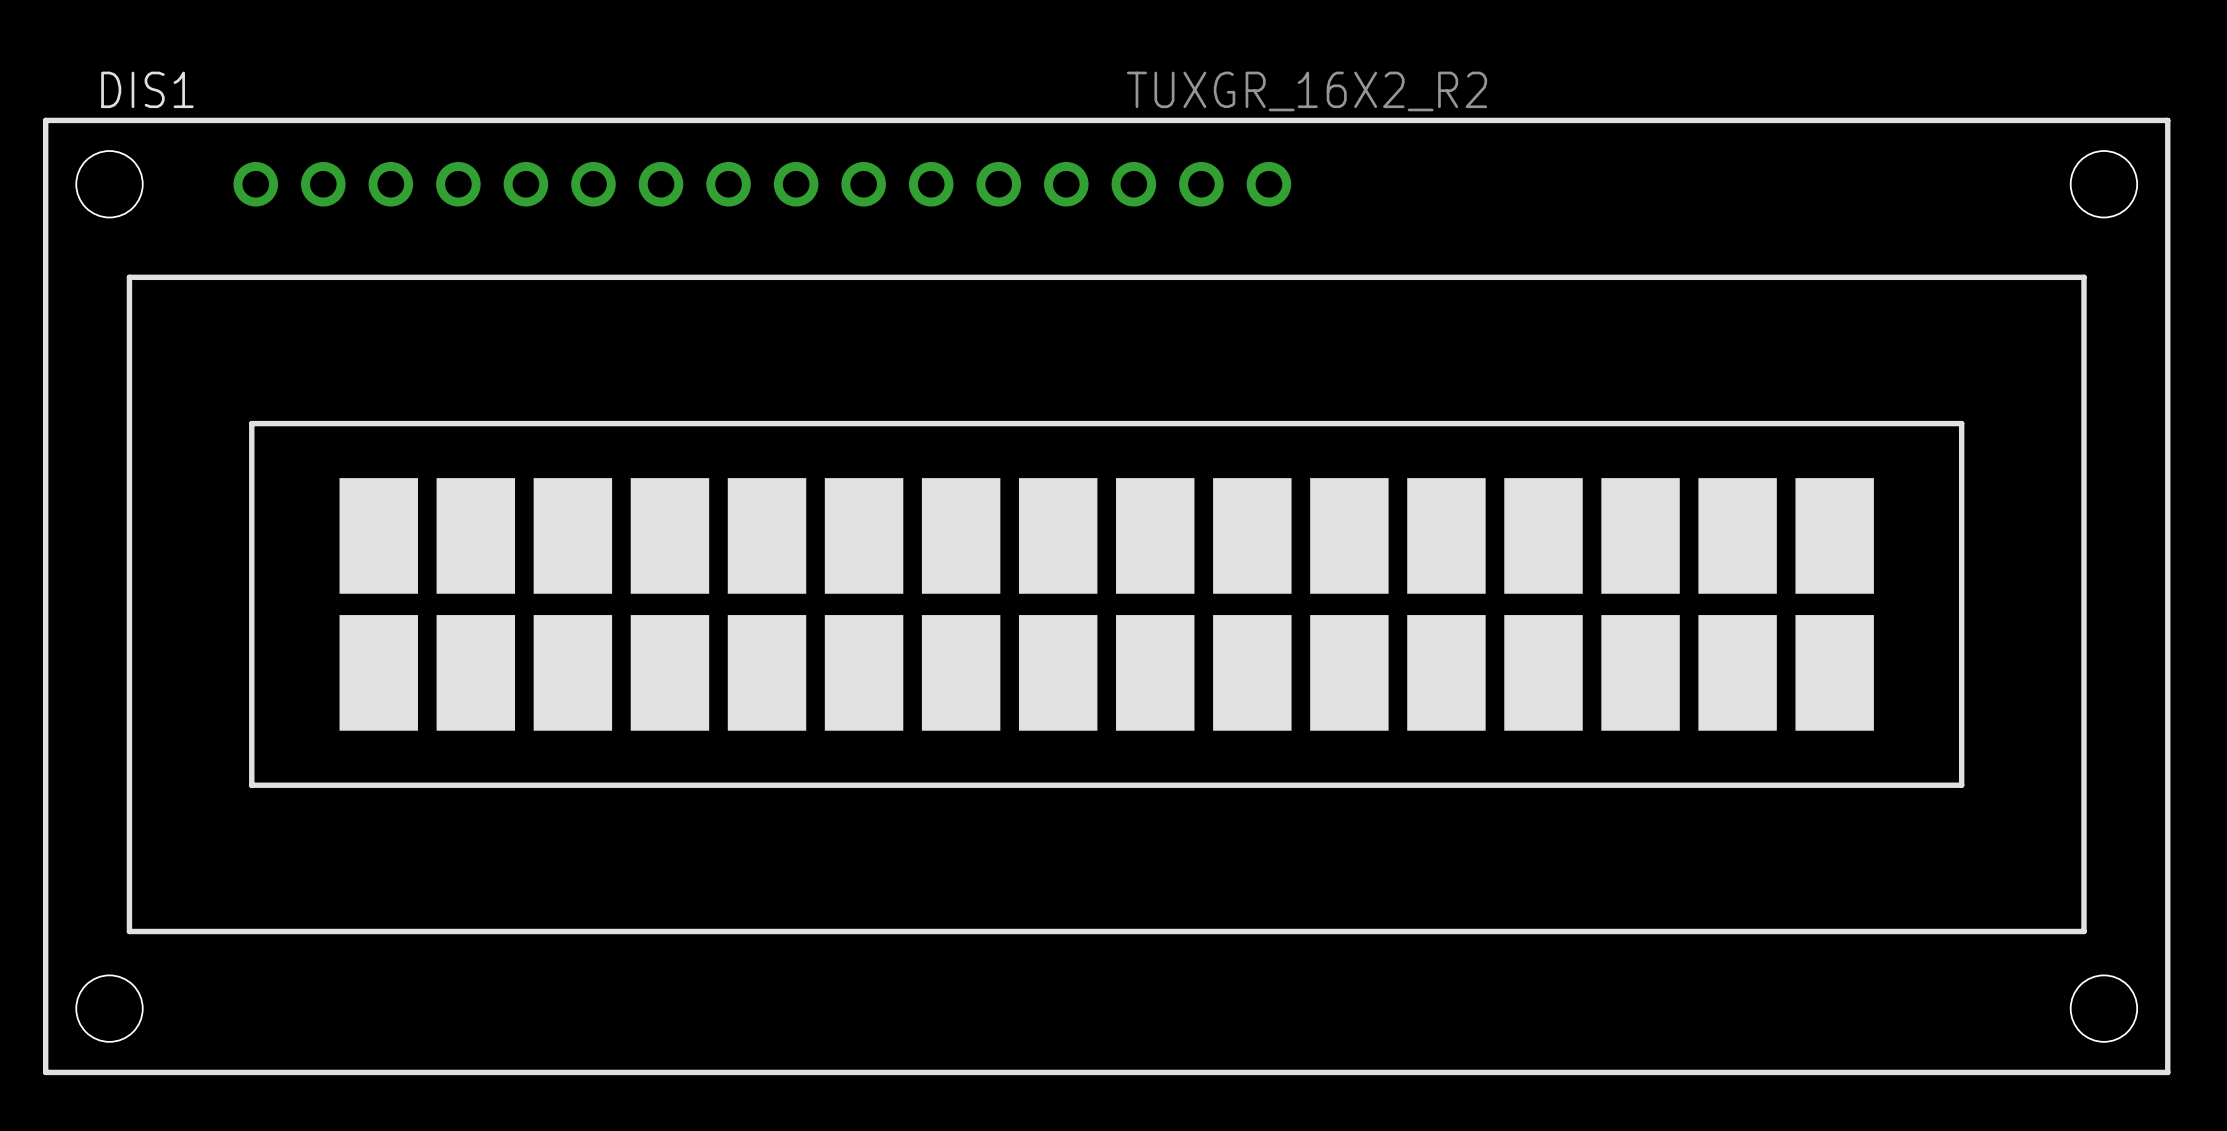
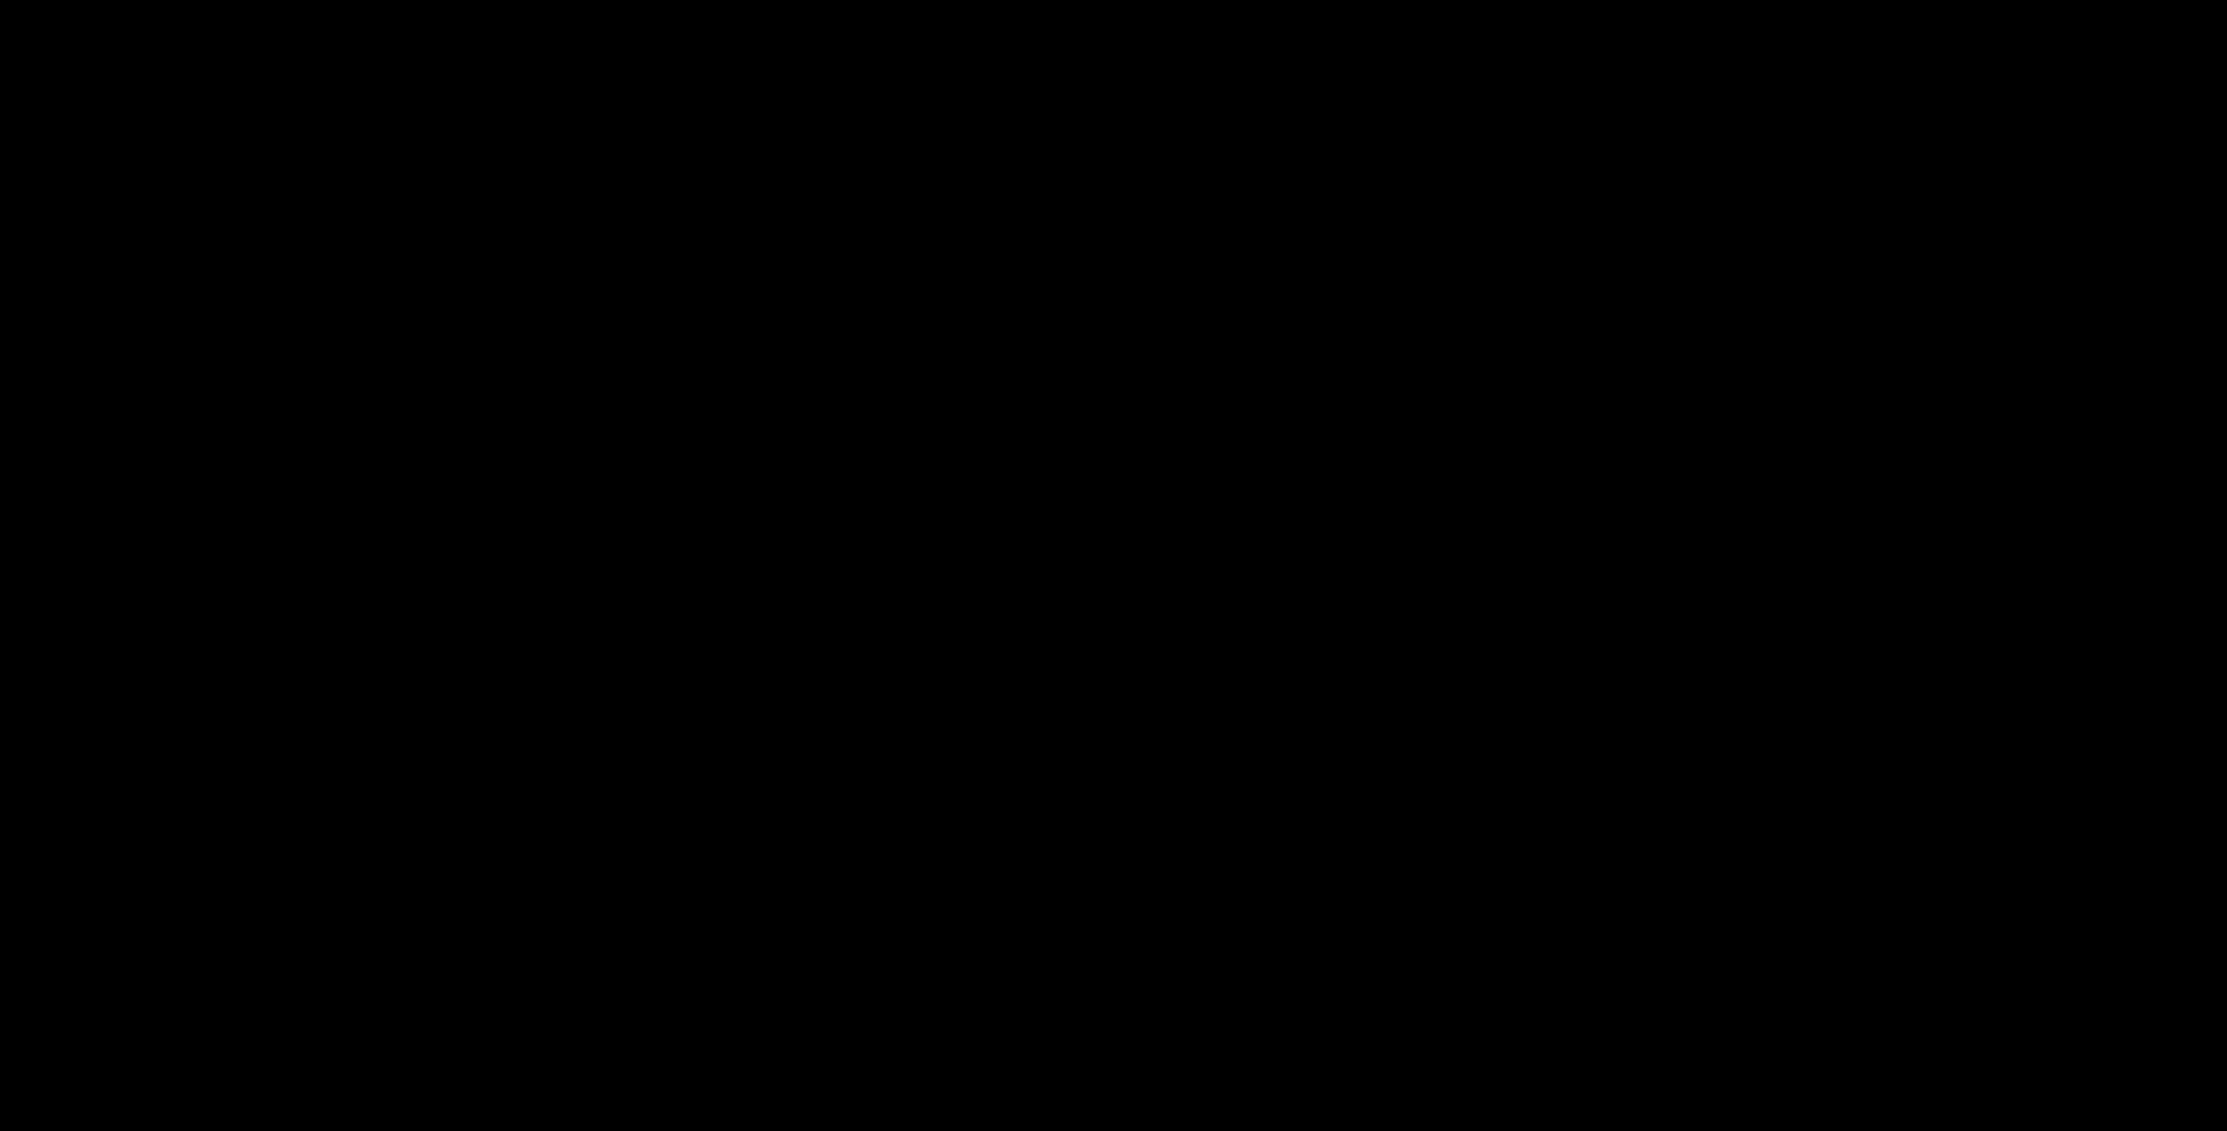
DIS1: TUXGR_16X2_R2 (1106, 596) -> none

